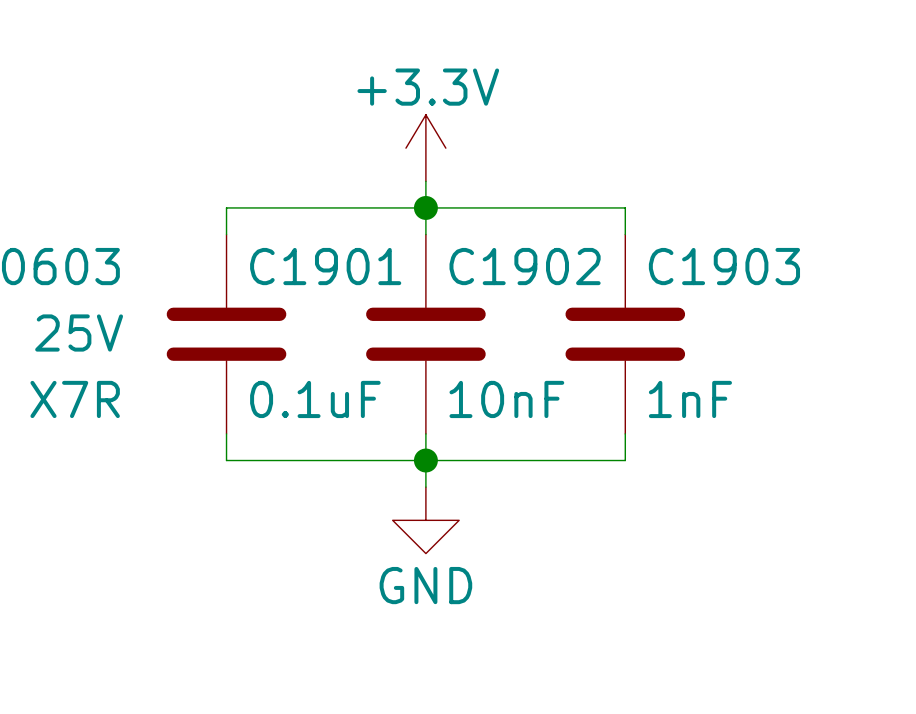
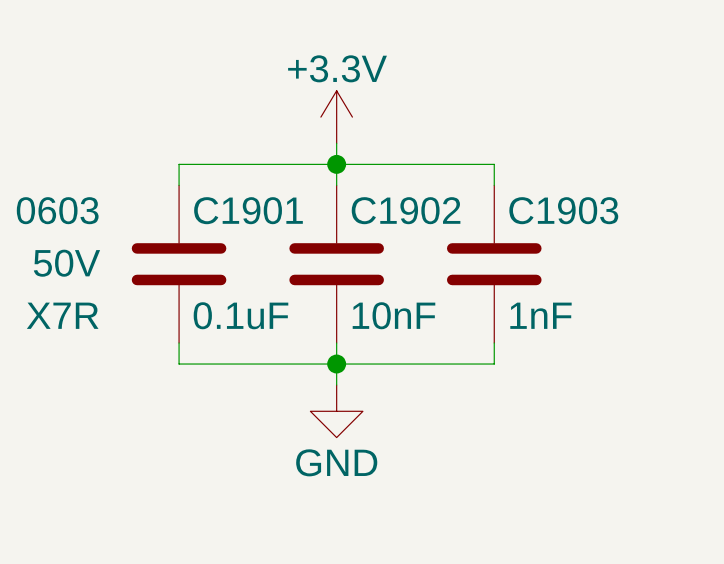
C1901 text: 25V (79, 333) -> 50V (66, 263)

